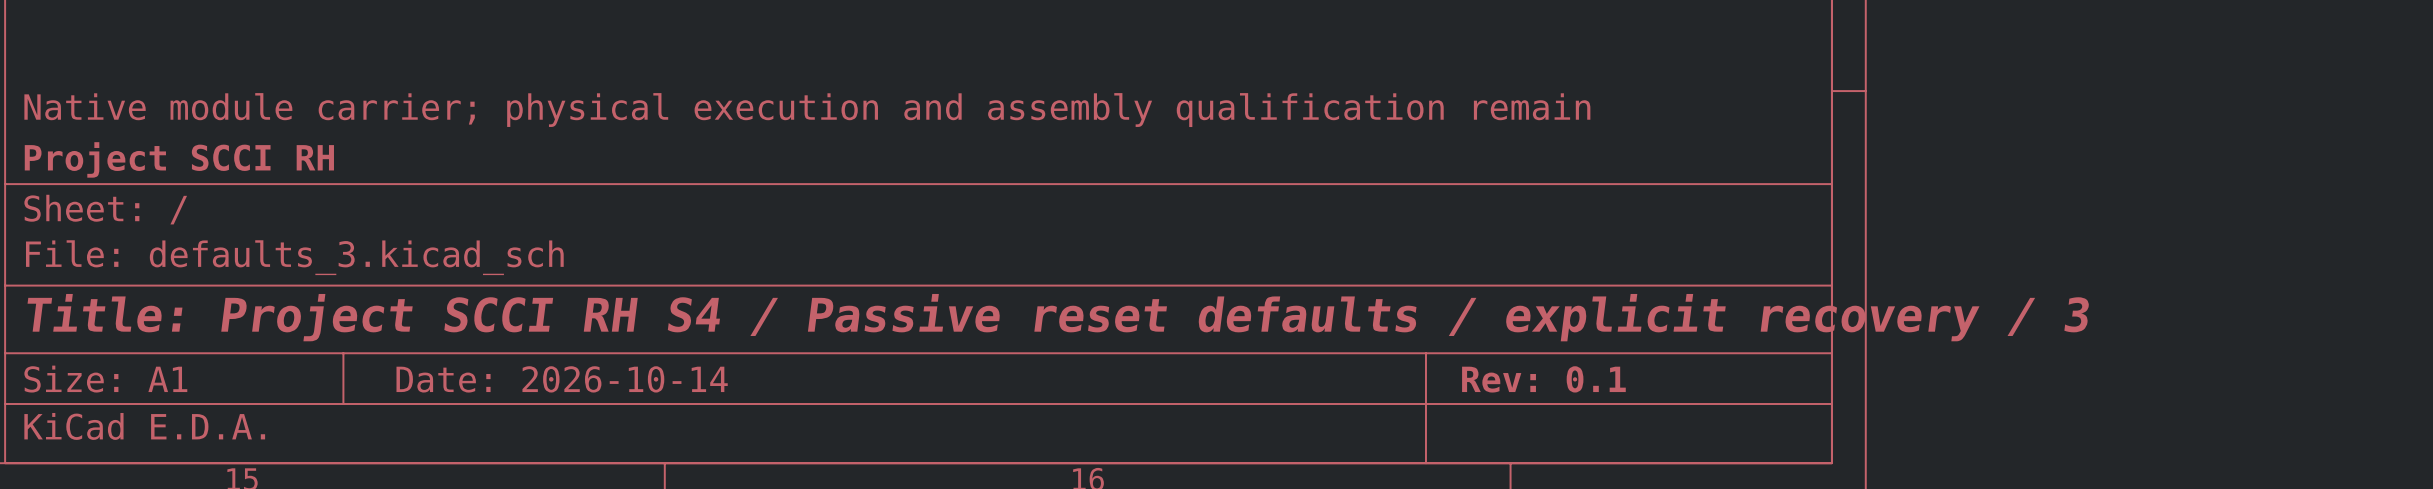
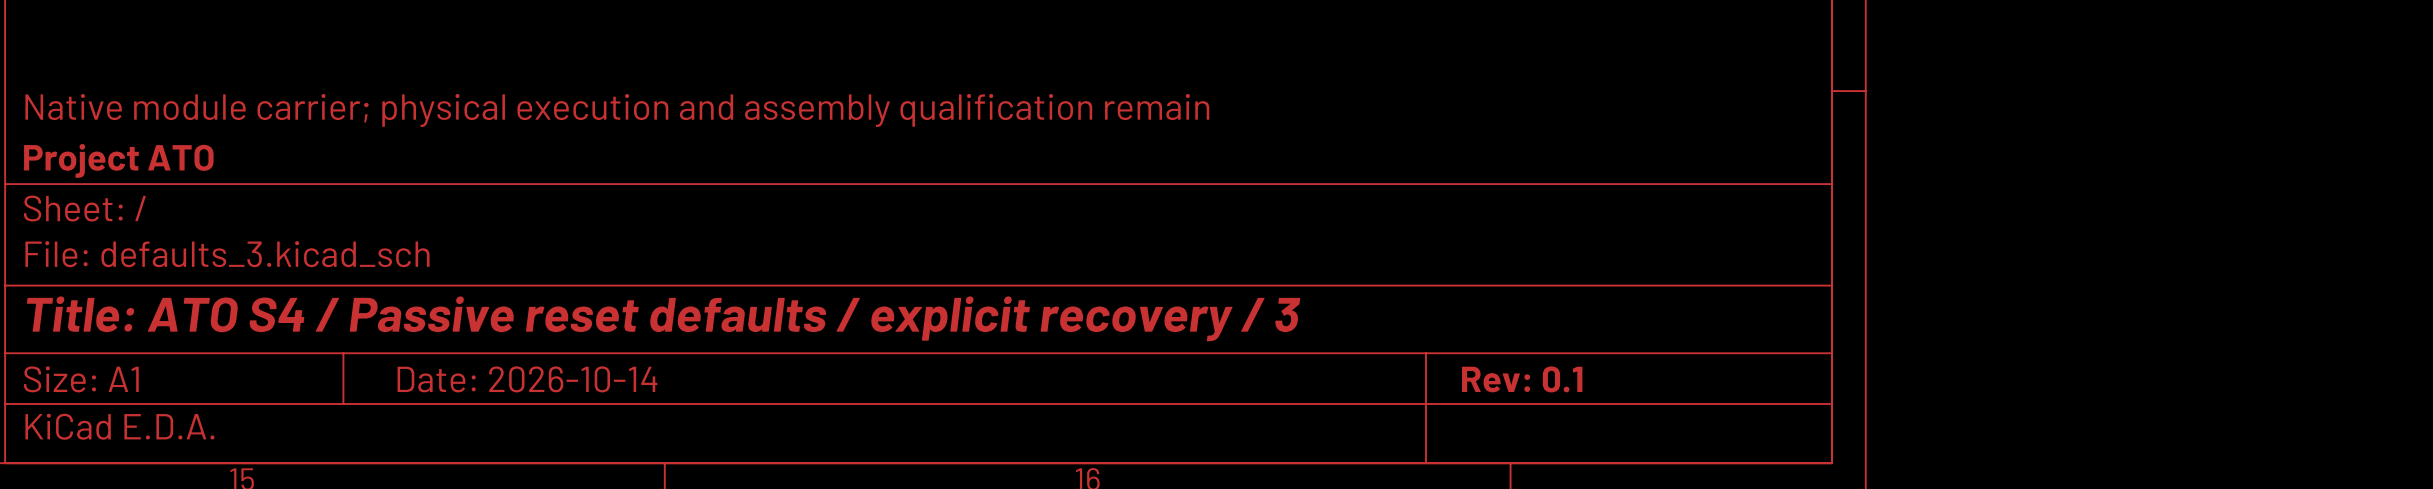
title block: Project SCCI RH (179, 159) -> Project ATO (118, 160)
title block: Title: Project SCCI RH S4 / Passive reset defaults / explicit recovery / 3 (1058, 317) -> Title: ATO S4 / Passive reset defaults / explicit recovery / 3 (663, 318)

